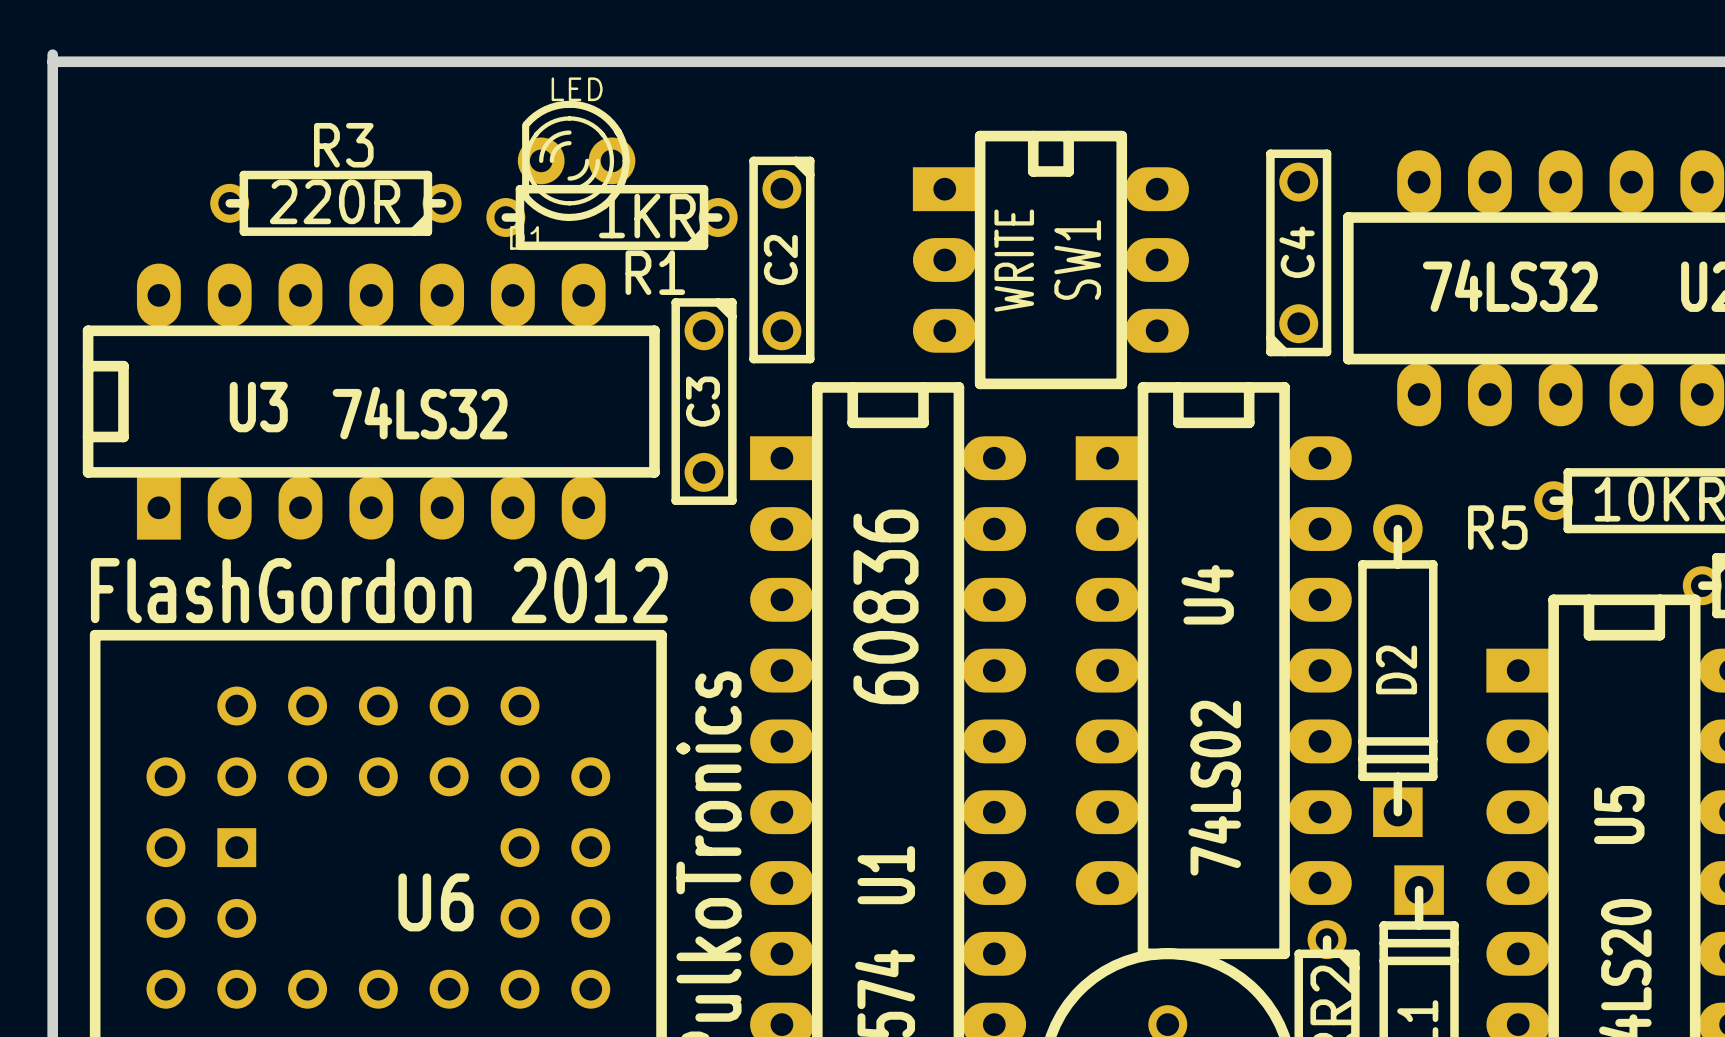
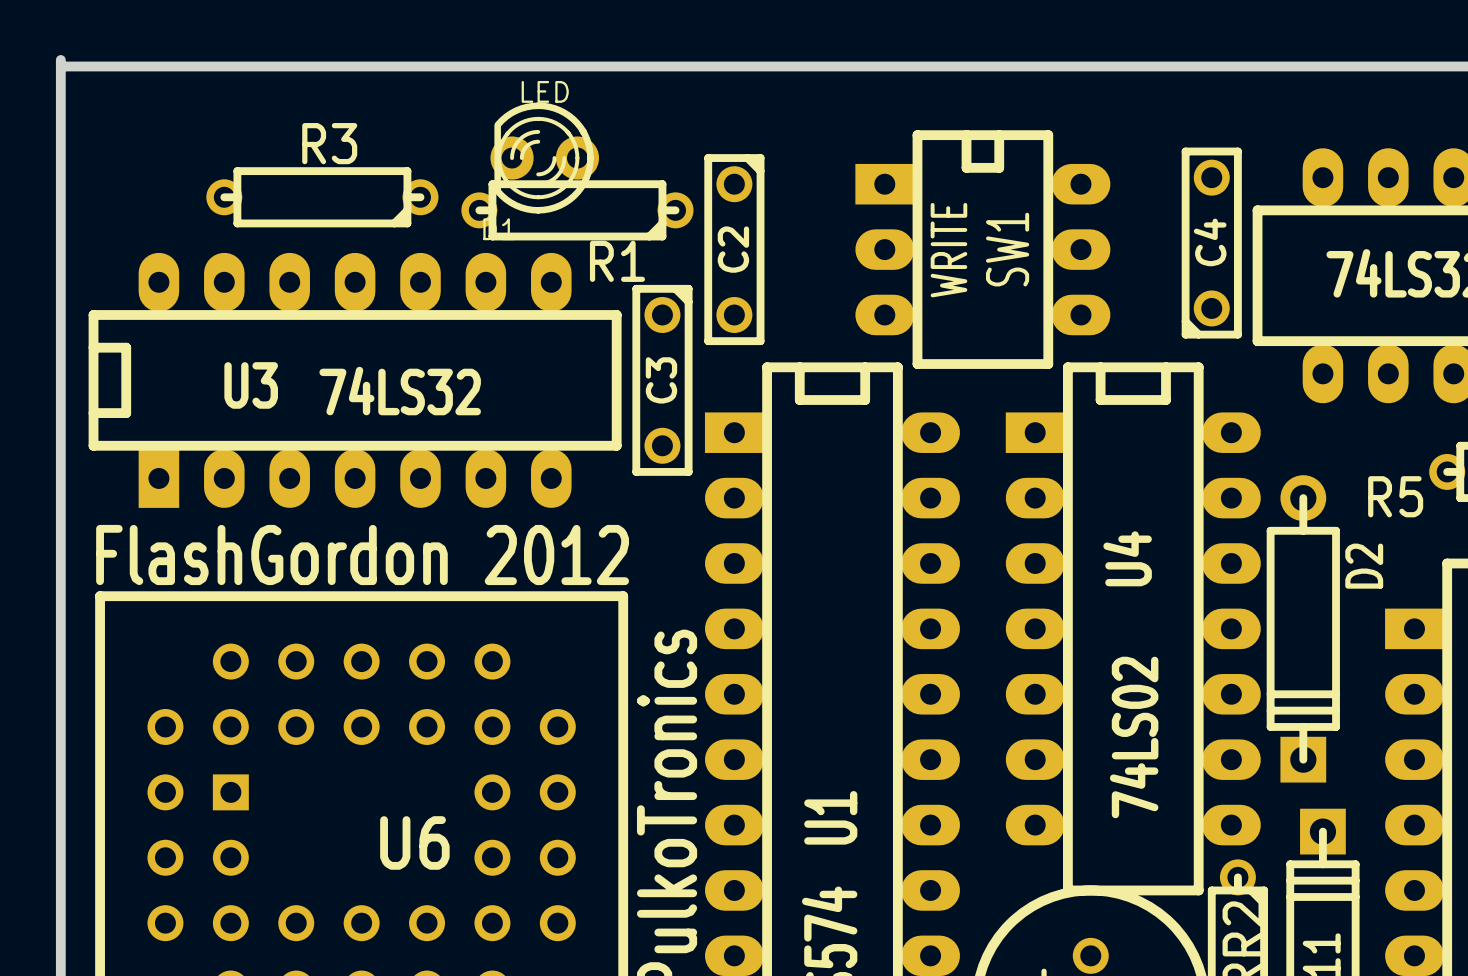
R3 value: 220R (335, 201) -> none
R1 value: 1KR (647, 216) -> none
text: 60836 (885, 606) -> none
D2 name position: D2 (1396, 669) -> D2 (1364, 566)

